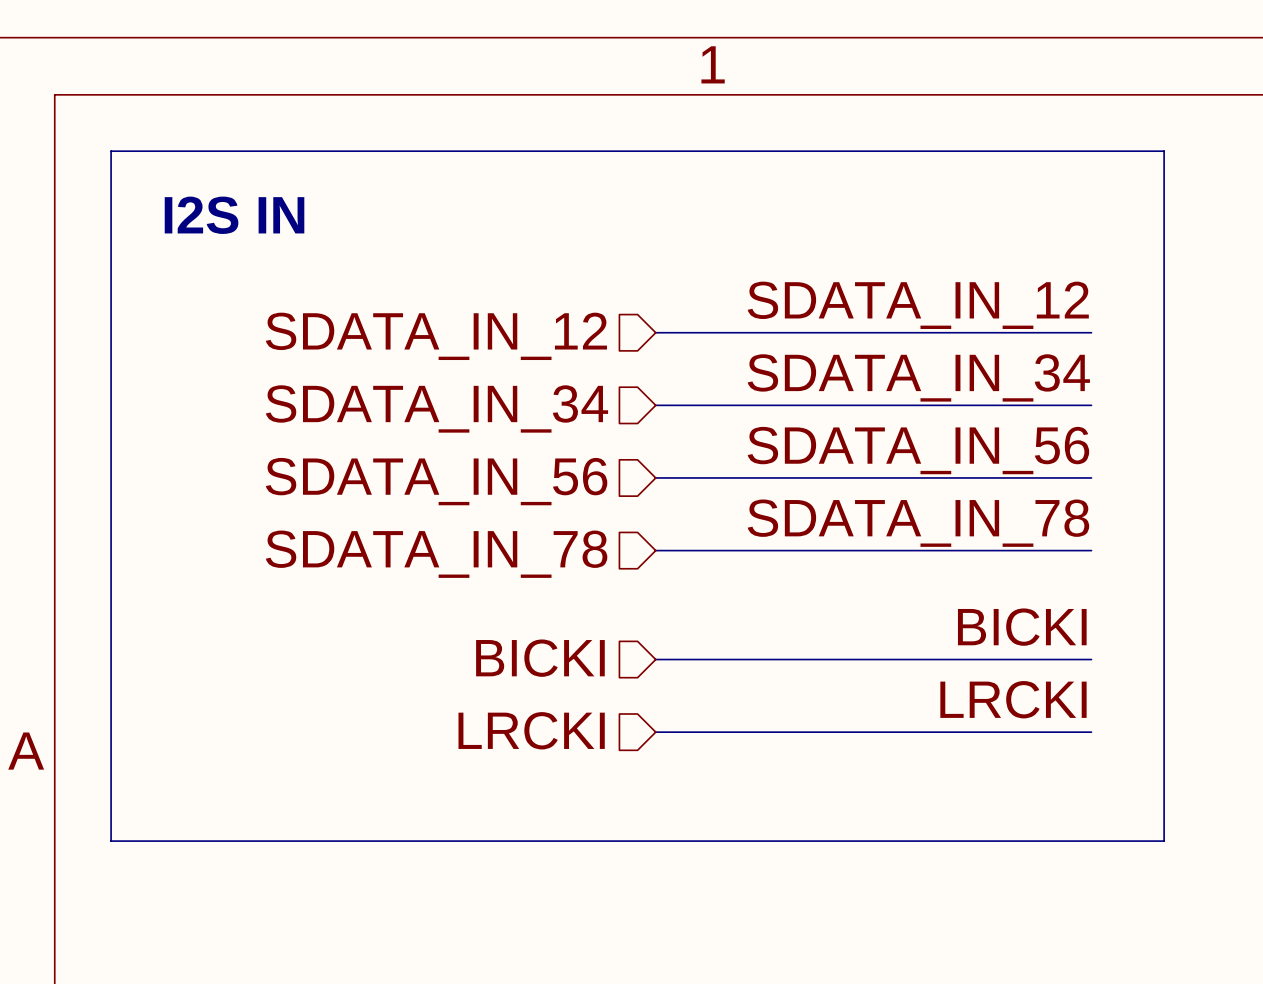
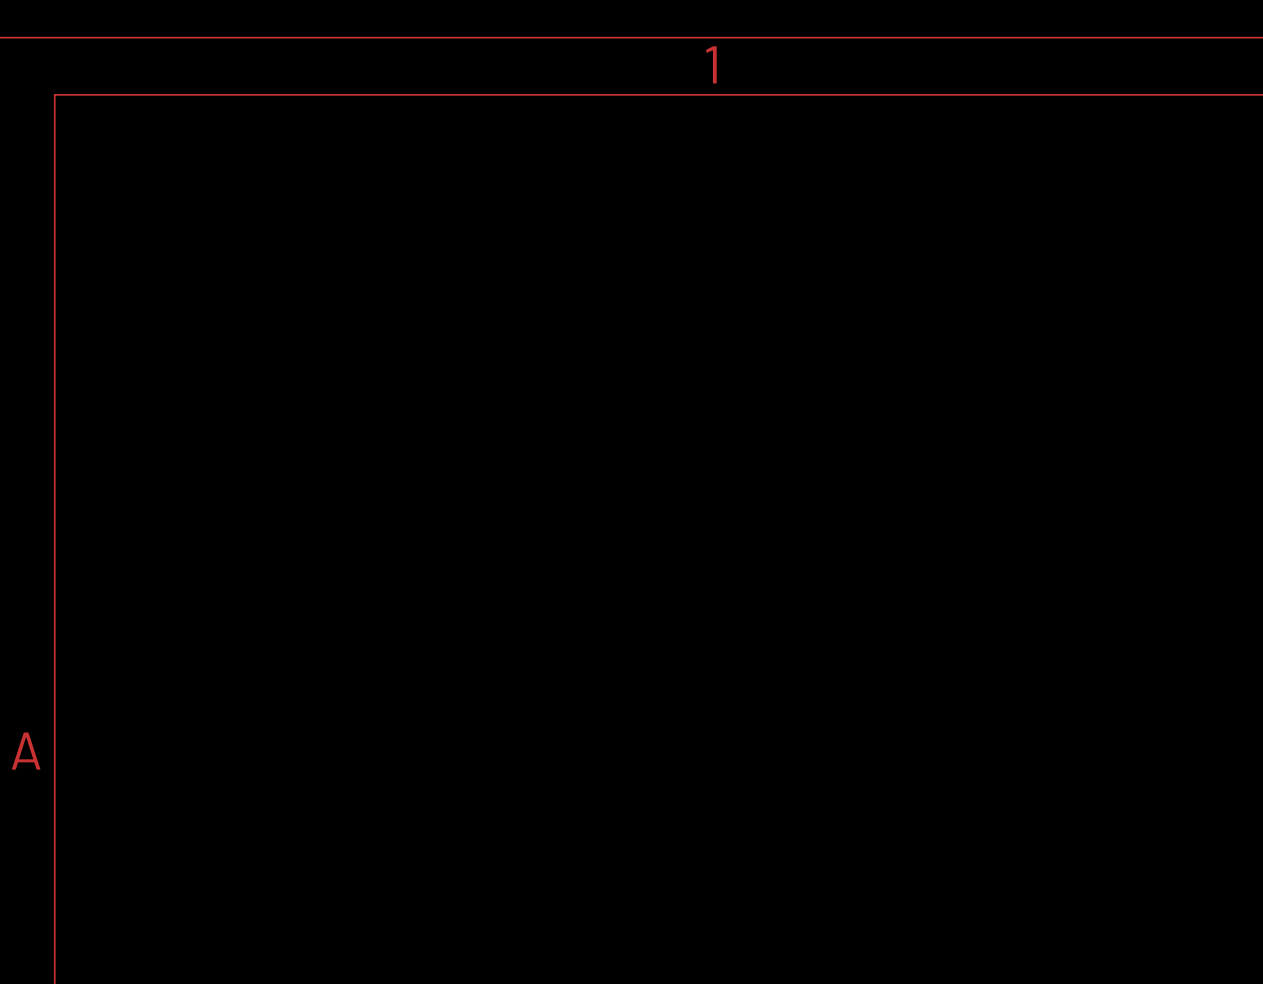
line: (111, 151) (1164, 151) (1164, 841) (111, 841) (111, 151) -> none
text: I2S IN (234, 215) -> none
label: SDATA_IN_12 (918, 305) -> none
wire: (655, 332) (1091, 332) -> none
hierarchical label: SDATA_IN_12 (436, 336) -> none
label: SDATA_IN_34 (918, 377) -> none
wire: (655, 405) (1091, 405) -> none
hierarchical label: SDATA_IN_34 (436, 408) -> none
label: SDATA_IN_56 (918, 450) -> none
wire: (655, 477) (1091, 477) -> none
hierarchical label: SDATA_IN_56 (436, 481) -> none
label: SDATA_IN_78 (918, 523) -> none
wire: (655, 550) (1091, 550) -> none
hierarchical label: SDATA_IN_78 (436, 554) -> none
label: BICKI (1022, 627) -> none
hierarchical label: BICKI (540, 658) -> none
wire: (655, 659) (1091, 659) -> none
label: LRCKI (1013, 699) -> none
hierarchical label: LRCKI (531, 730) -> none
wire: (655, 732) (1091, 732) -> none

